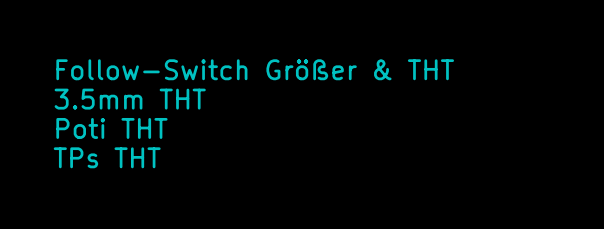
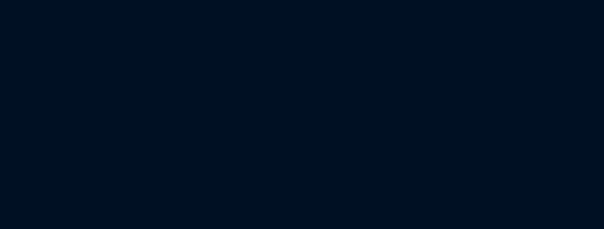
text: Follow-Switch Größer & THT (255, 69) -> none
text: 3.5mm THT (130, 99) -> none
text: Poti THT (111, 128) -> none
text: TPs THT (107, 157) -> none

